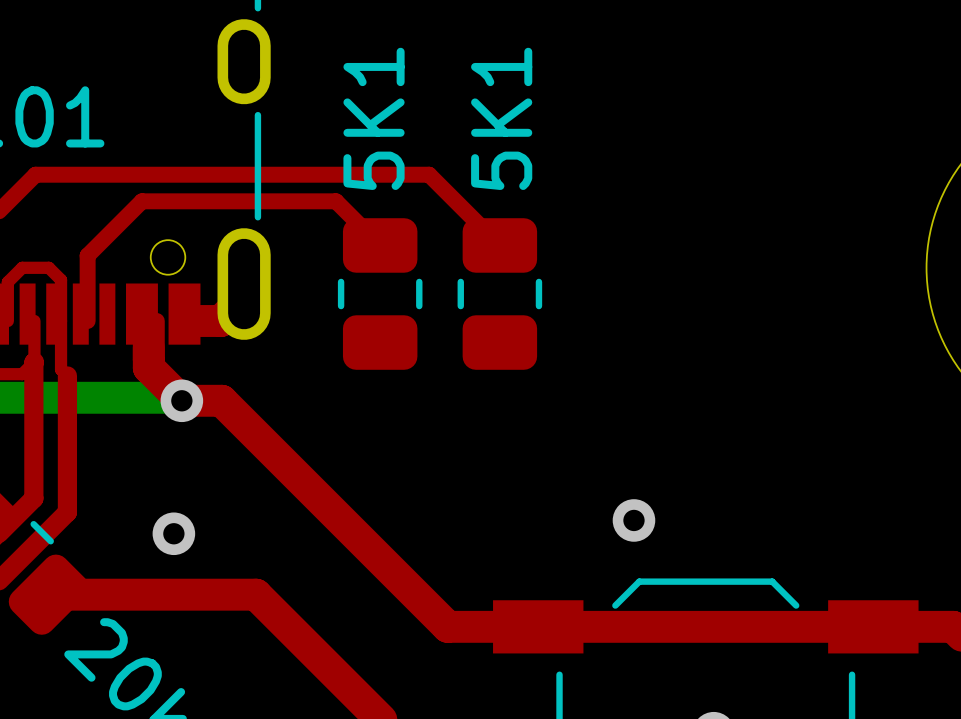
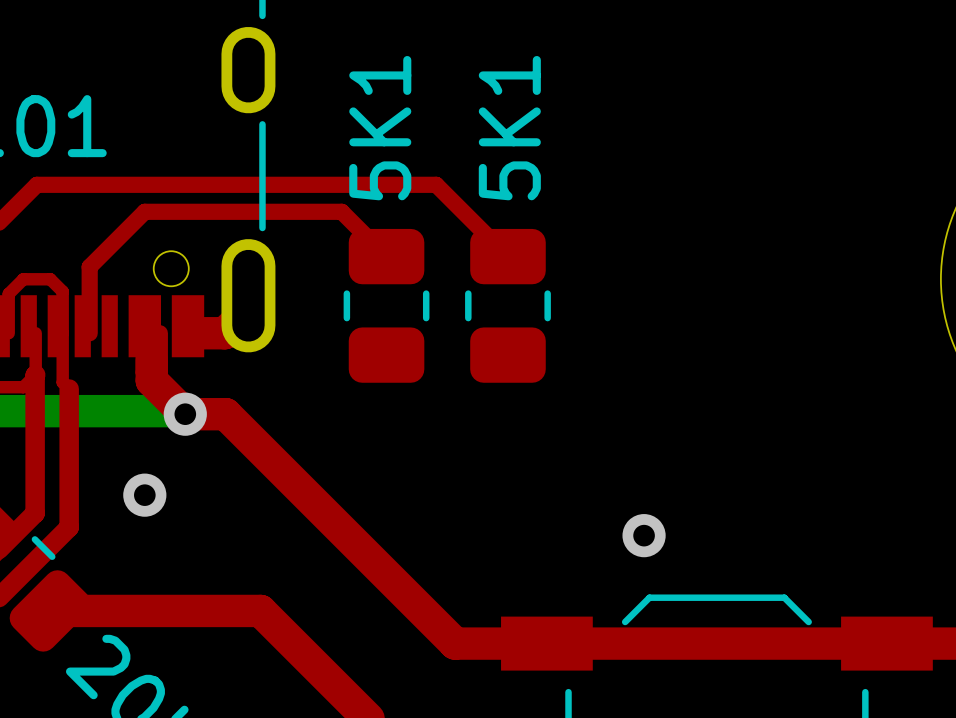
via position: (173, 533) -> (144, 495)

